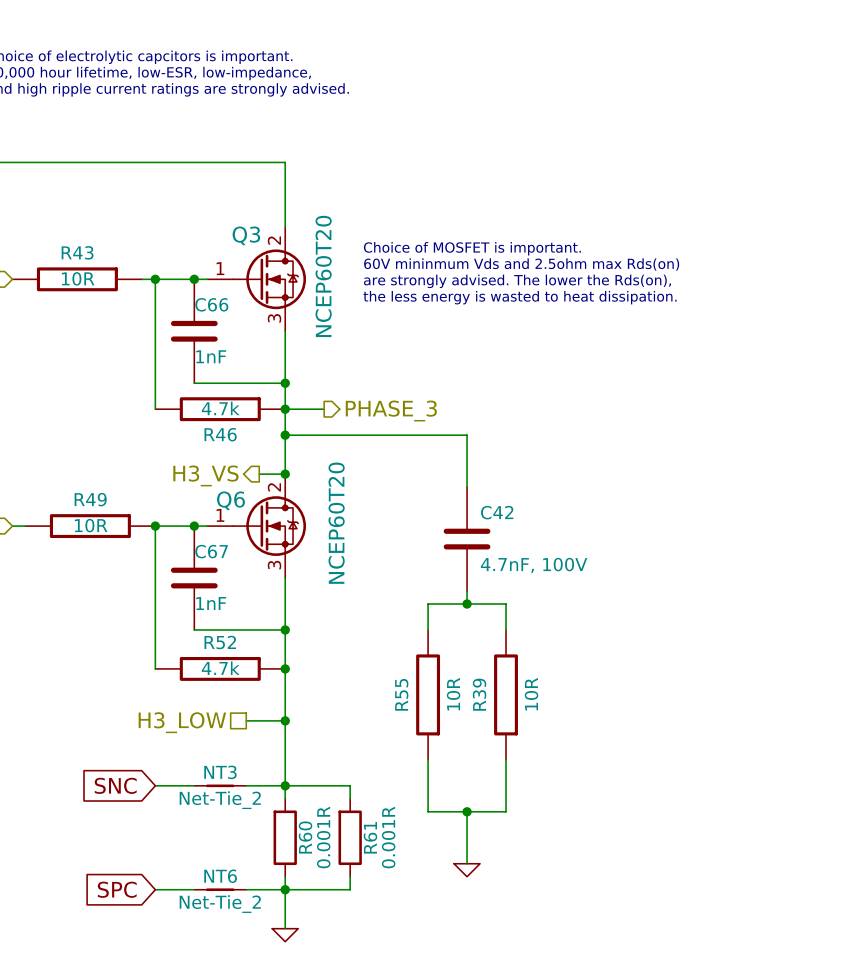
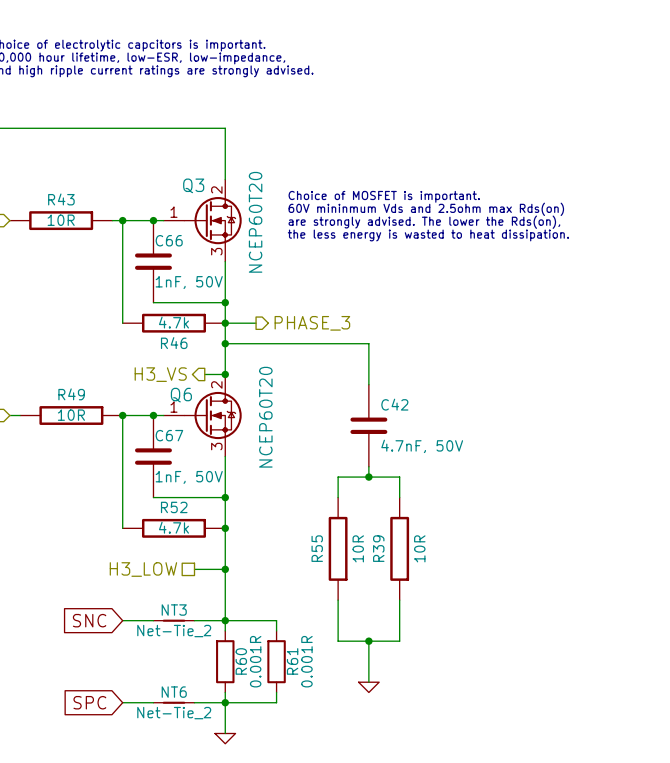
C66 value: 1nF (211, 356) -> 1nF, 50V (189, 282)
C42 value: 4.7nF, 100V (534, 565) -> 4.7nF, 50V (422, 446)
C67 value: 1nF (211, 603) -> 1nF, 50V (189, 477)

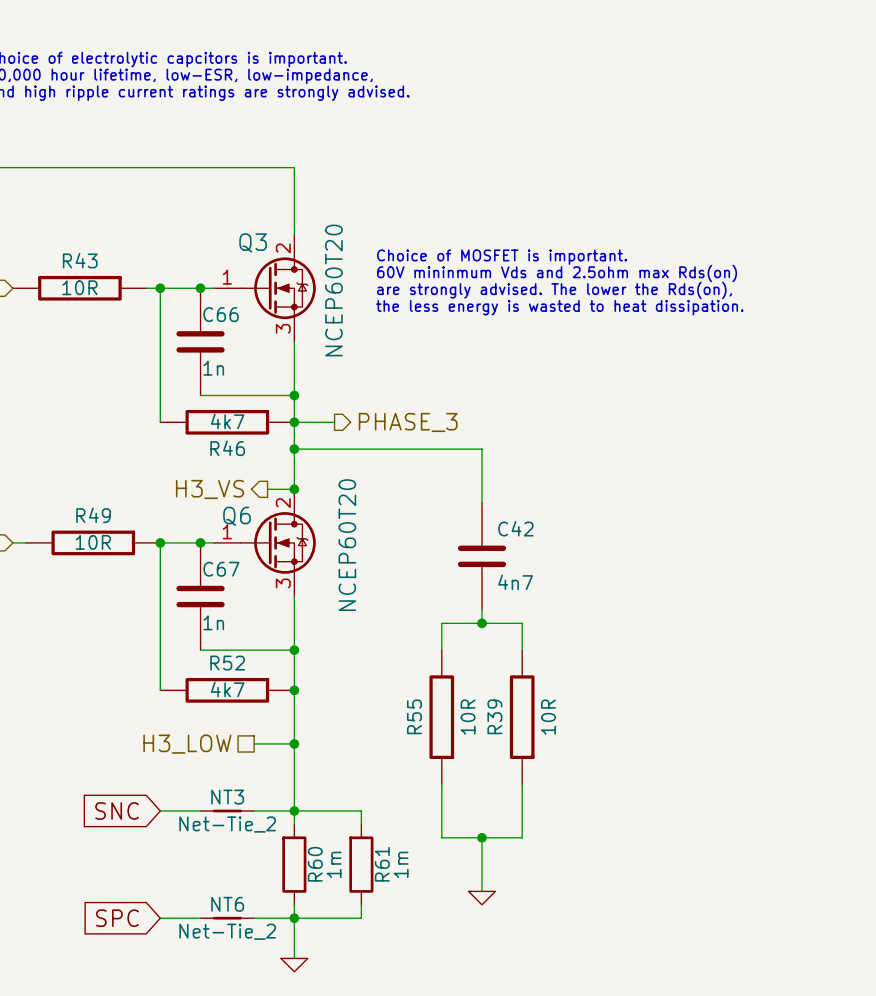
C66 value: 1nF, 50V (189, 282) -> 1n (213, 368)
R46 value: 4.7k (173, 322) -> 4k7 (227, 421)
C42 value: 4.7nF, 50V (422, 446) -> 4n7 (515, 582)
C67 value: 1nF, 50V (189, 477) -> 1n (213, 622)
R52 value: 4.7k (173, 527) -> 4k7 (227, 689)
R60 value: 0.001R (255, 661) -> 1m (334, 864)
R61 value: 0.001R (306, 661) -> 1m (401, 864)

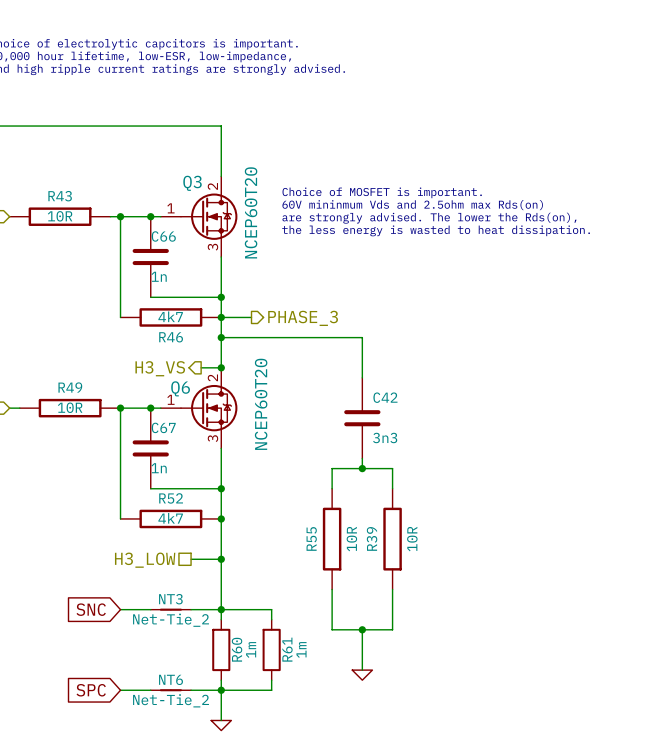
C42 value: 4n7 (515, 582) -> 3n3 (385, 437)

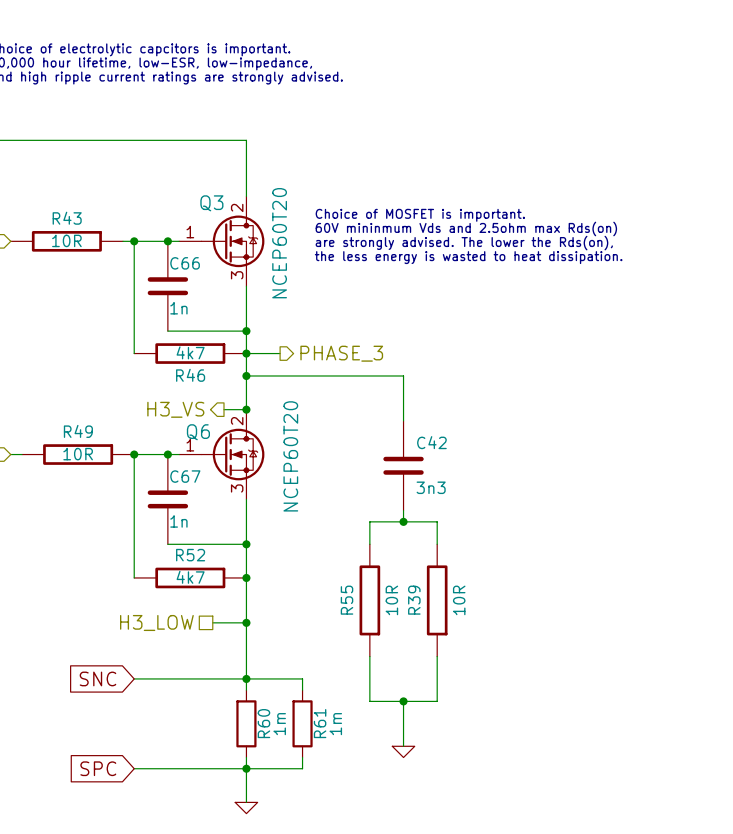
NT3: Net-Tie_2 (170, 609) -> none
NT6: Net-Tie_2 (170, 690) -> none

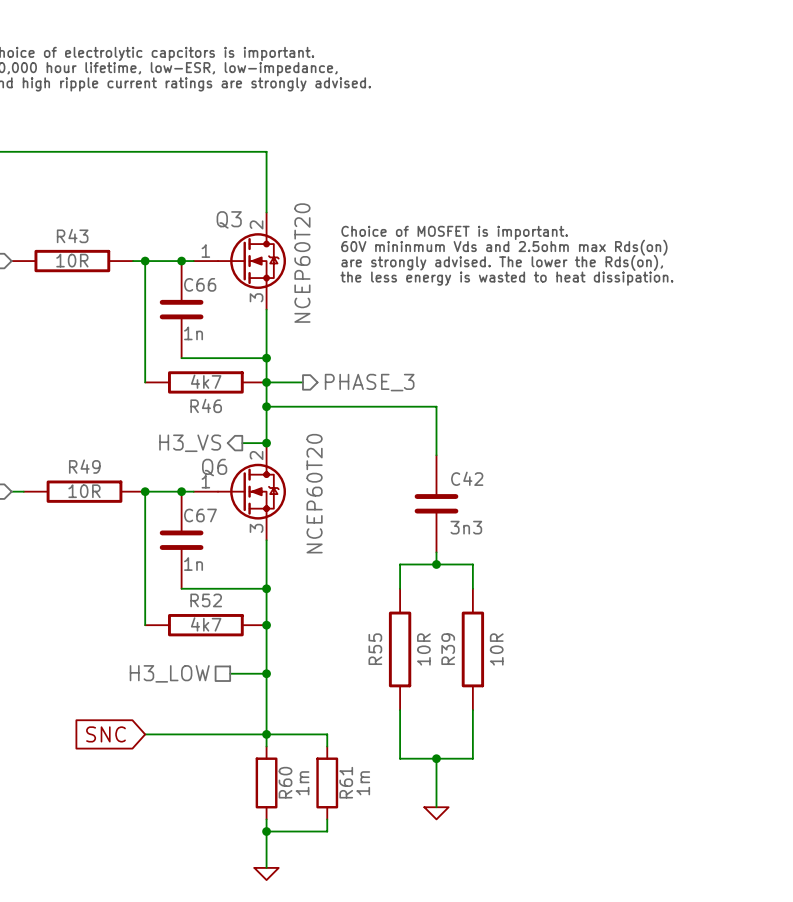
global label: SPC (98, 768) -> none
wire: (134, 768) (246, 768) -> none

